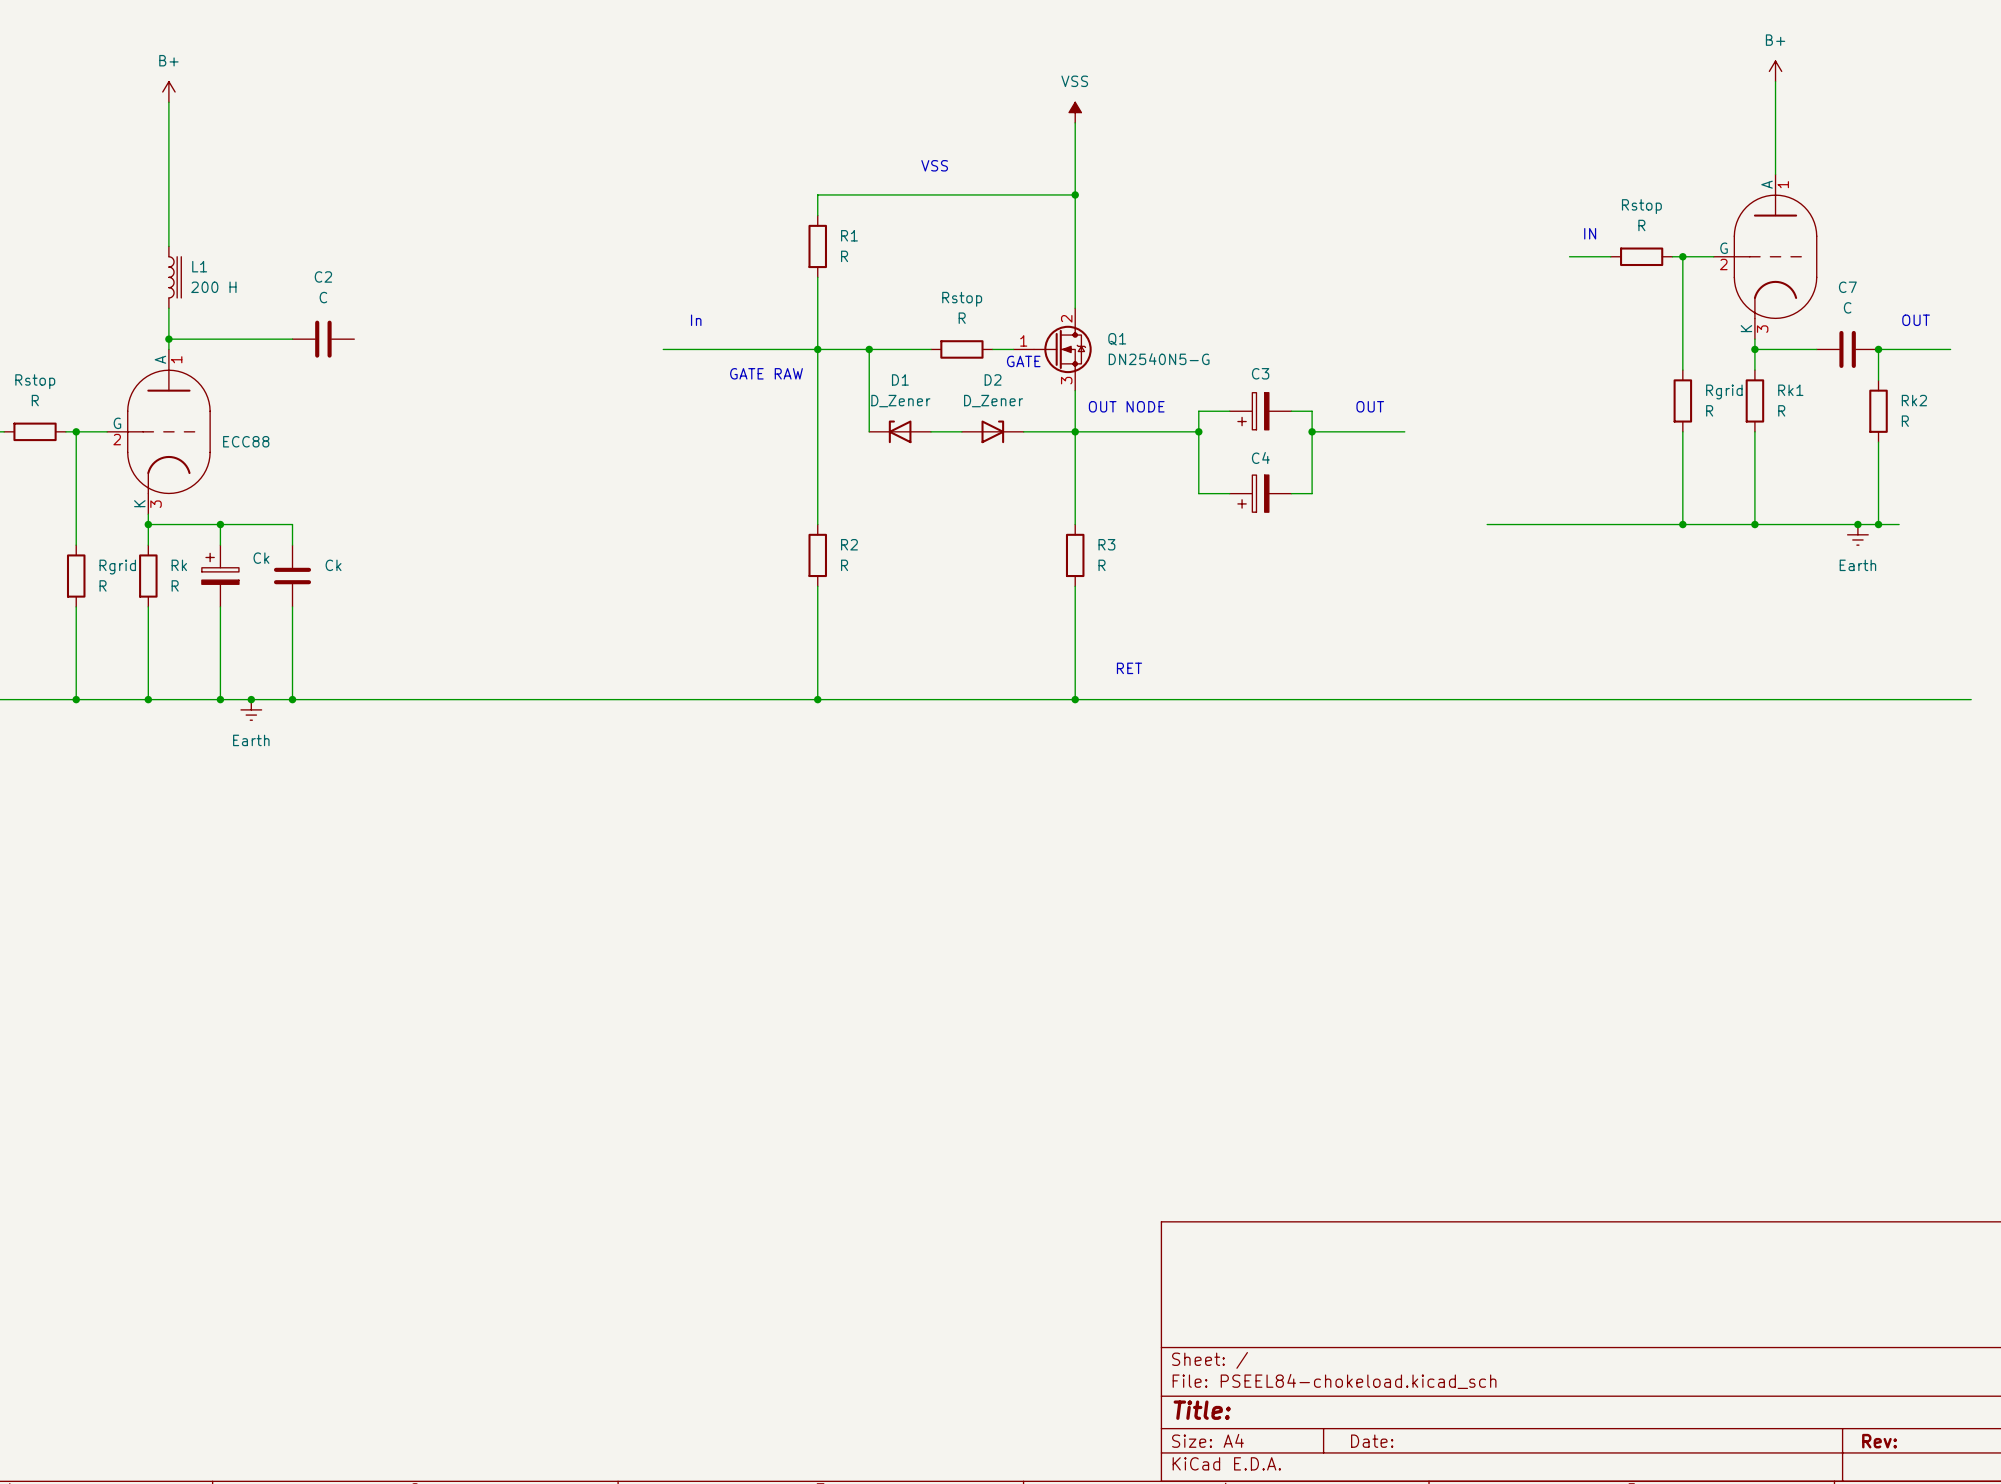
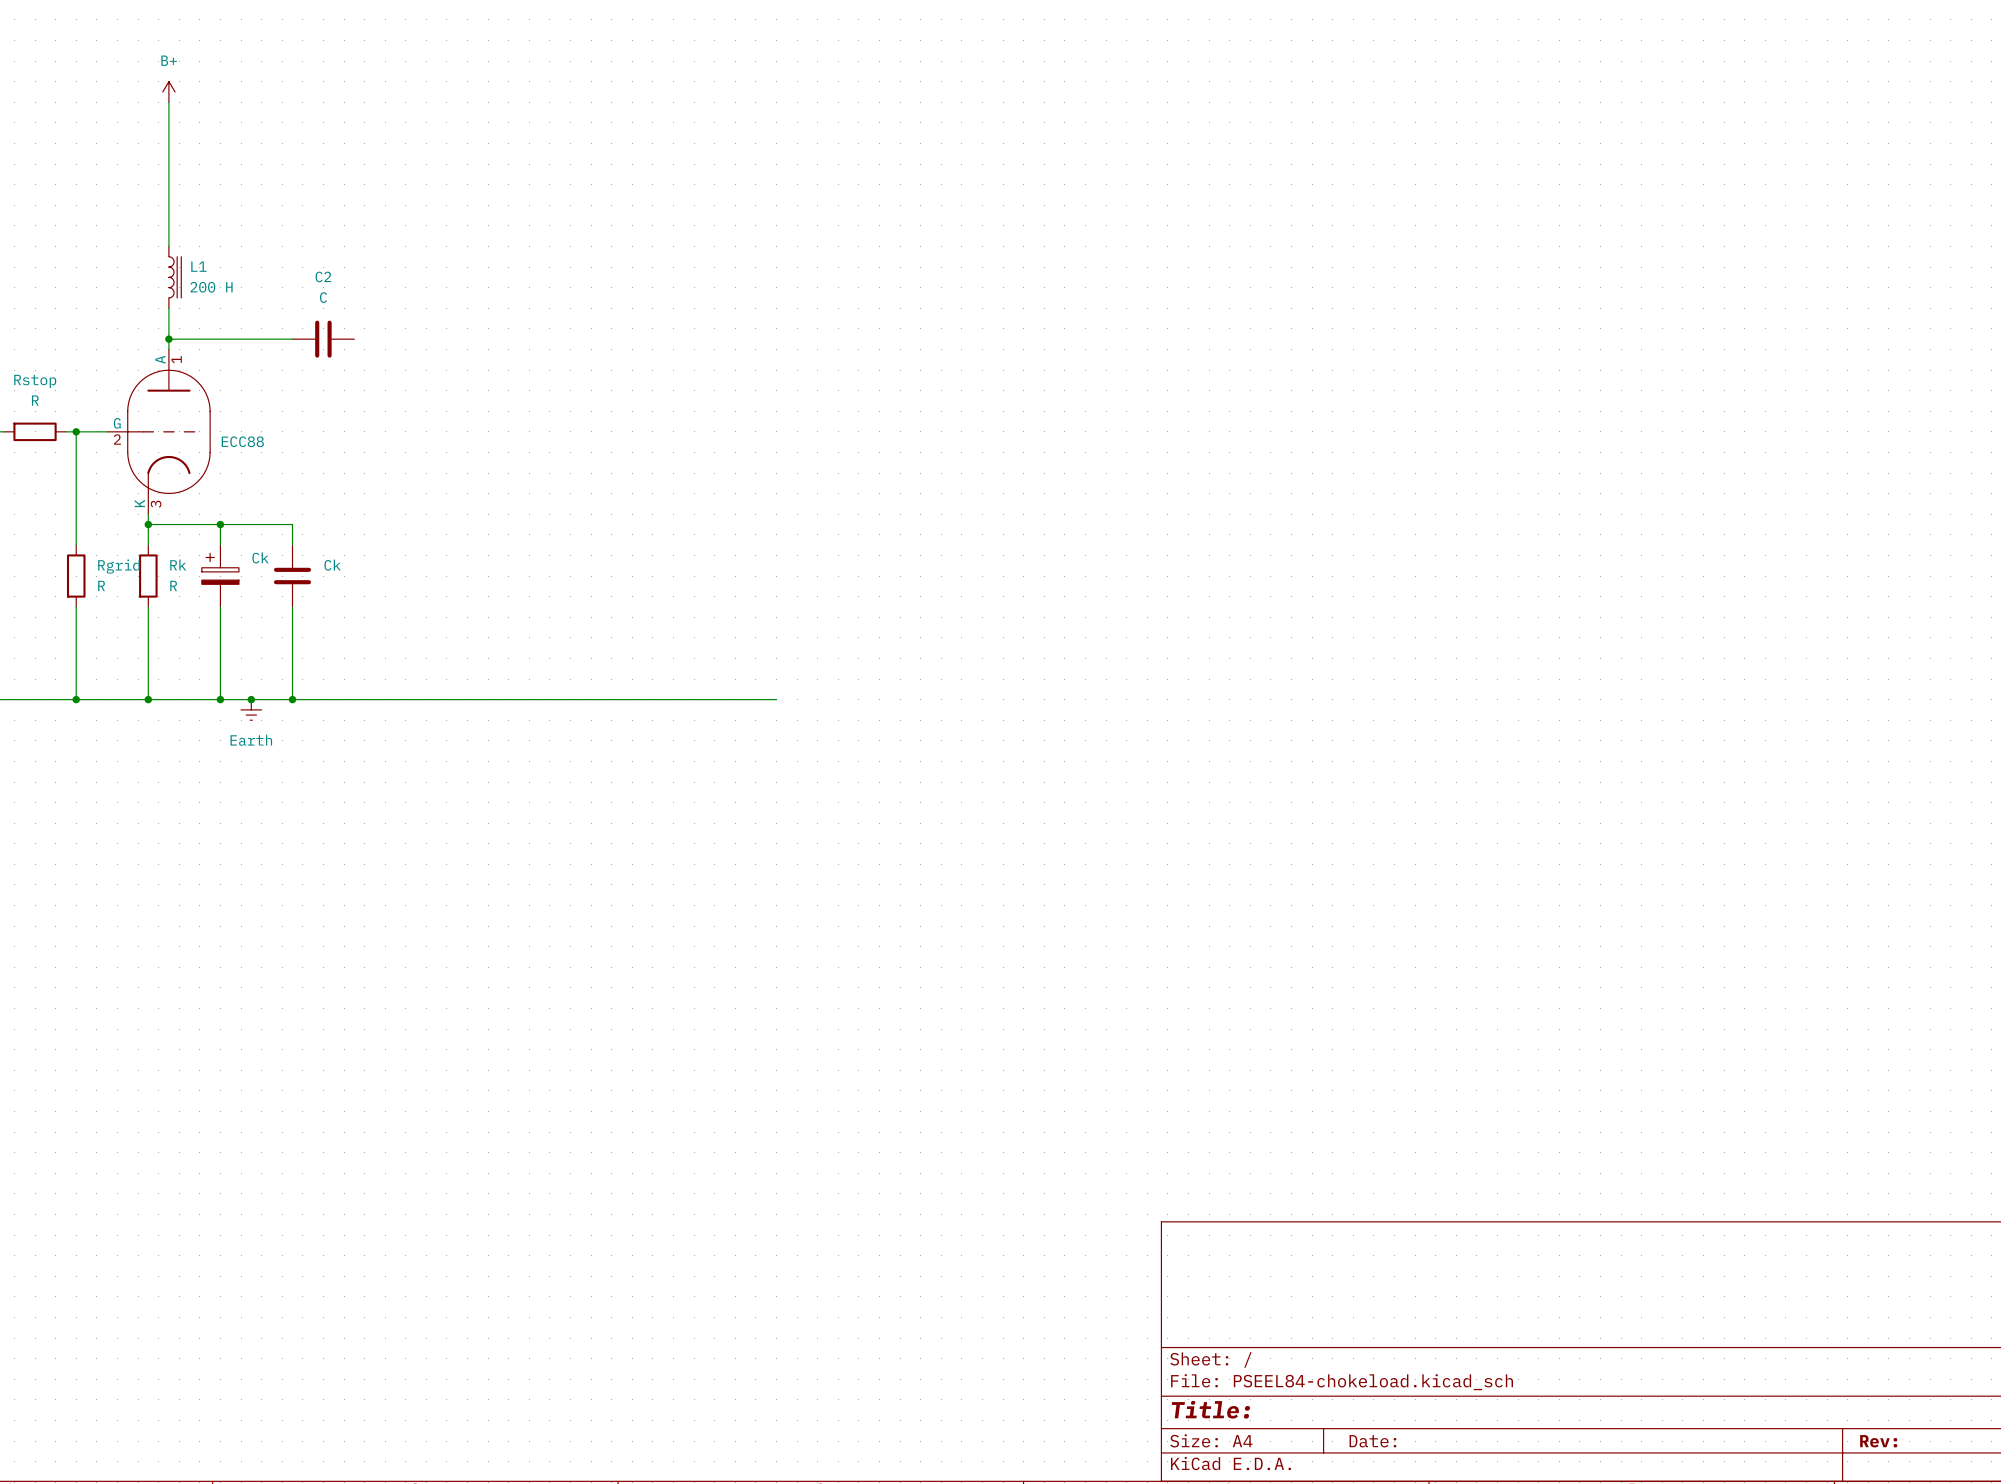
power symbol: B+ (1775, 71) -> none
wire: (1775, 81) (1775, 174) -> none
power symbol: VSS (1075, 112) -> none
wire: (1075, 122) (1075, 308) -> none
text: VSS (934, 165) -> none
wire: (1075, 194) (817, 194) (817, 215) -> none
junction: (1075, 194) -> none
text: IN (1590, 233) -> none
R1: R (817, 246) -> none
wire: (1569, 256) (1610, 256) -> none
Rstop: R (1641, 256) -> none
wire: (1672, 256) (1713, 256) -> none
wire: (1682, 256) (1682, 370) -> none
junction: (1682, 256) -> none
part: (1765, 256) -> none
wire: (817, 277) (817, 524) -> none
text: In (696, 320) -> none
text: OUT (1916, 320) -> none
wire: (1754, 339) (1754, 370) -> none
wire: (663, 349) (931, 349) -> none
junction: (817, 349) -> none
wire: (869, 349) (869, 431) -> none
junction: (869, 349) -> none
Rstop: R (961, 349) -> none
wire: (992, 349) (1013, 349) -> none
Q1: DN2540N5-G (1052, 349) -> none
wire: (1754, 349) (1816, 349) -> none
junction: (1754, 349) -> none
C7: C (1847, 349) -> none
junction: (1878, 349) -> none
wire: (1950, 349) (1878, 349) (1878, 380) -> none
text: GATE (1023, 361) -> none
text: GATE RAW (766, 373) -> none
wire: (1075, 390) (1075, 524) -> none
Rgrid: R (1682, 400) -> none
Rk1: R (1754, 400) -> none
text: OUT NODE (1126, 406) -> none
text: OUT (1370, 406) -> none
wire: (1229, 411) (1198, 411) (1198, 493) (1229, 493) -> none
C3: (1260, 411) -> none
wire: (1291, 411) (1312, 411) (1312, 493) (1291, 493) -> none
Rk2: R (1878, 411) -> none
D1: D_Zener (900, 431) -> none
wire: (931, 431) (961, 431) -> none
D2: D_Zener (992, 431) -> none
wire: (1023, 431) (1198, 431) -> none
junction: (1075, 431) -> none
junction: (1198, 431) -> none
wire: (1312, 431) (1404, 431) -> none
junction: (1312, 431) -> none
wire: (1682, 431) (1682, 524) -> none
wire: (1754, 431) (1754, 524) -> none
wire: (1878, 442) (1878, 524) -> none
C4: (1260, 493) -> none
wire: (1487, 524) (1899, 524) -> none
junction: (1682, 524) -> none
junction: (1754, 524) -> none
junction: (1857, 524) -> none
junction: (1878, 524) -> none
power symbol: Earth (1857, 534) -> none
R2: R (817, 555) -> none
R3: R (1075, 555) -> none
wire: (817, 586) (817, 699) -> none
wire: (1075, 586) (1075, 699) -> none
text: RET (1129, 668) -> none
wire: (776, 699) (1971, 699) -> none
junction: (817, 699) -> none
junction: (1075, 699) -> none

